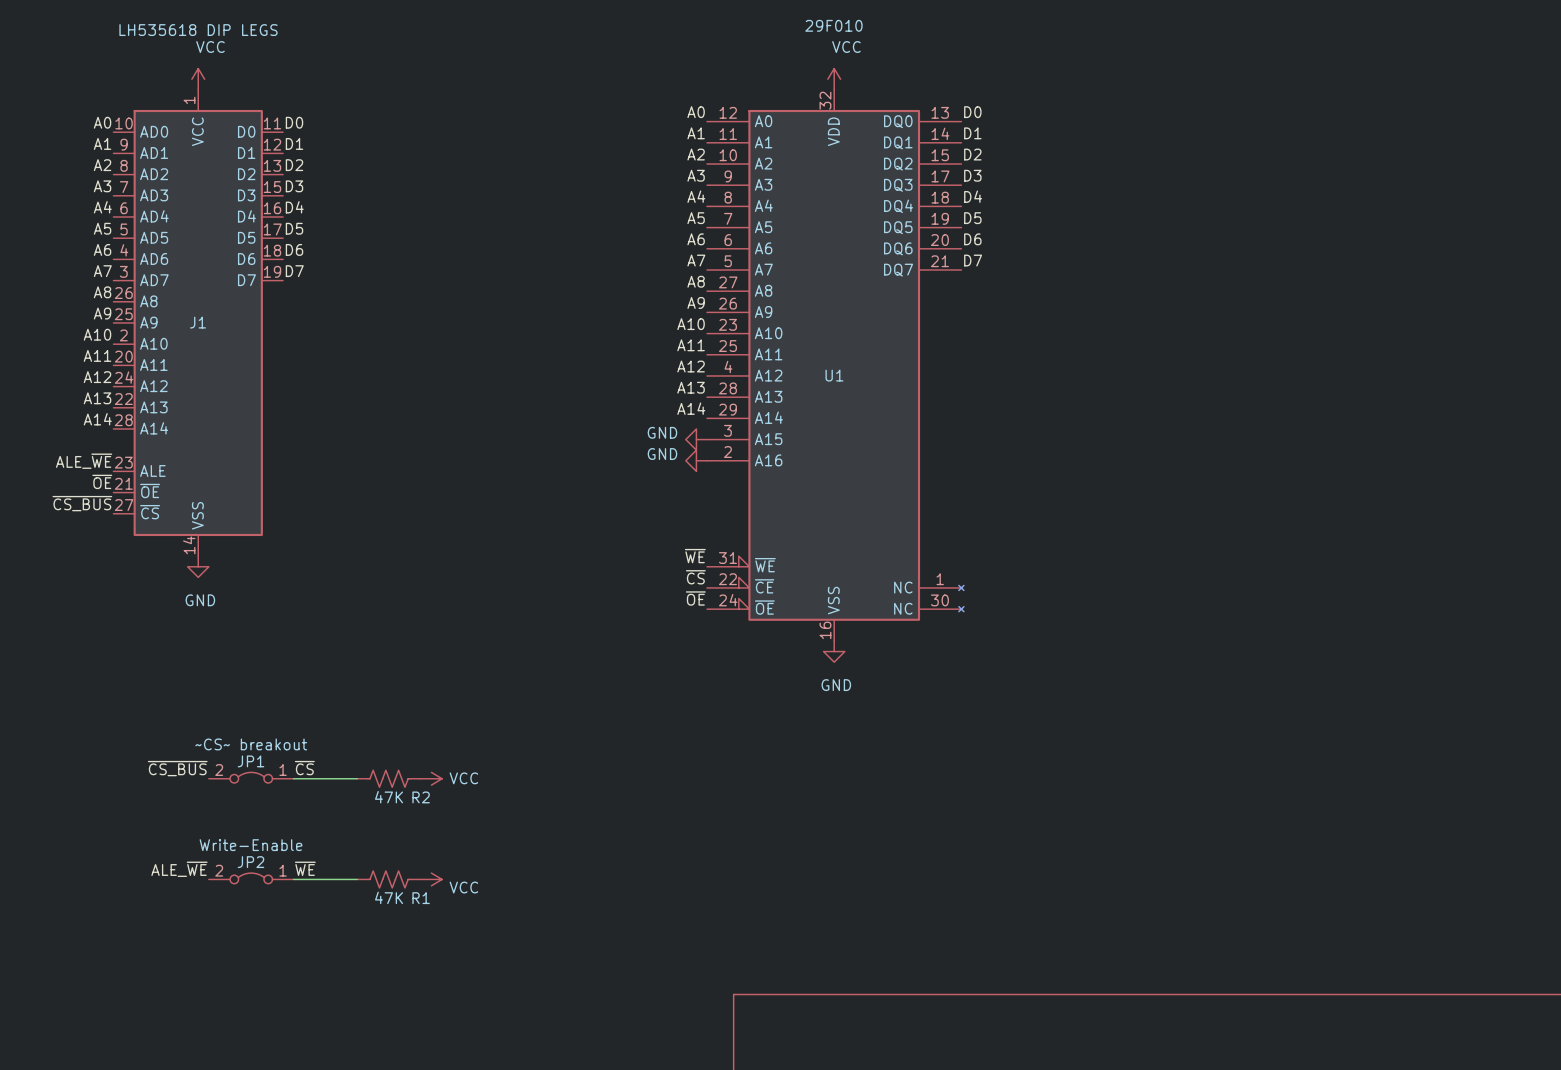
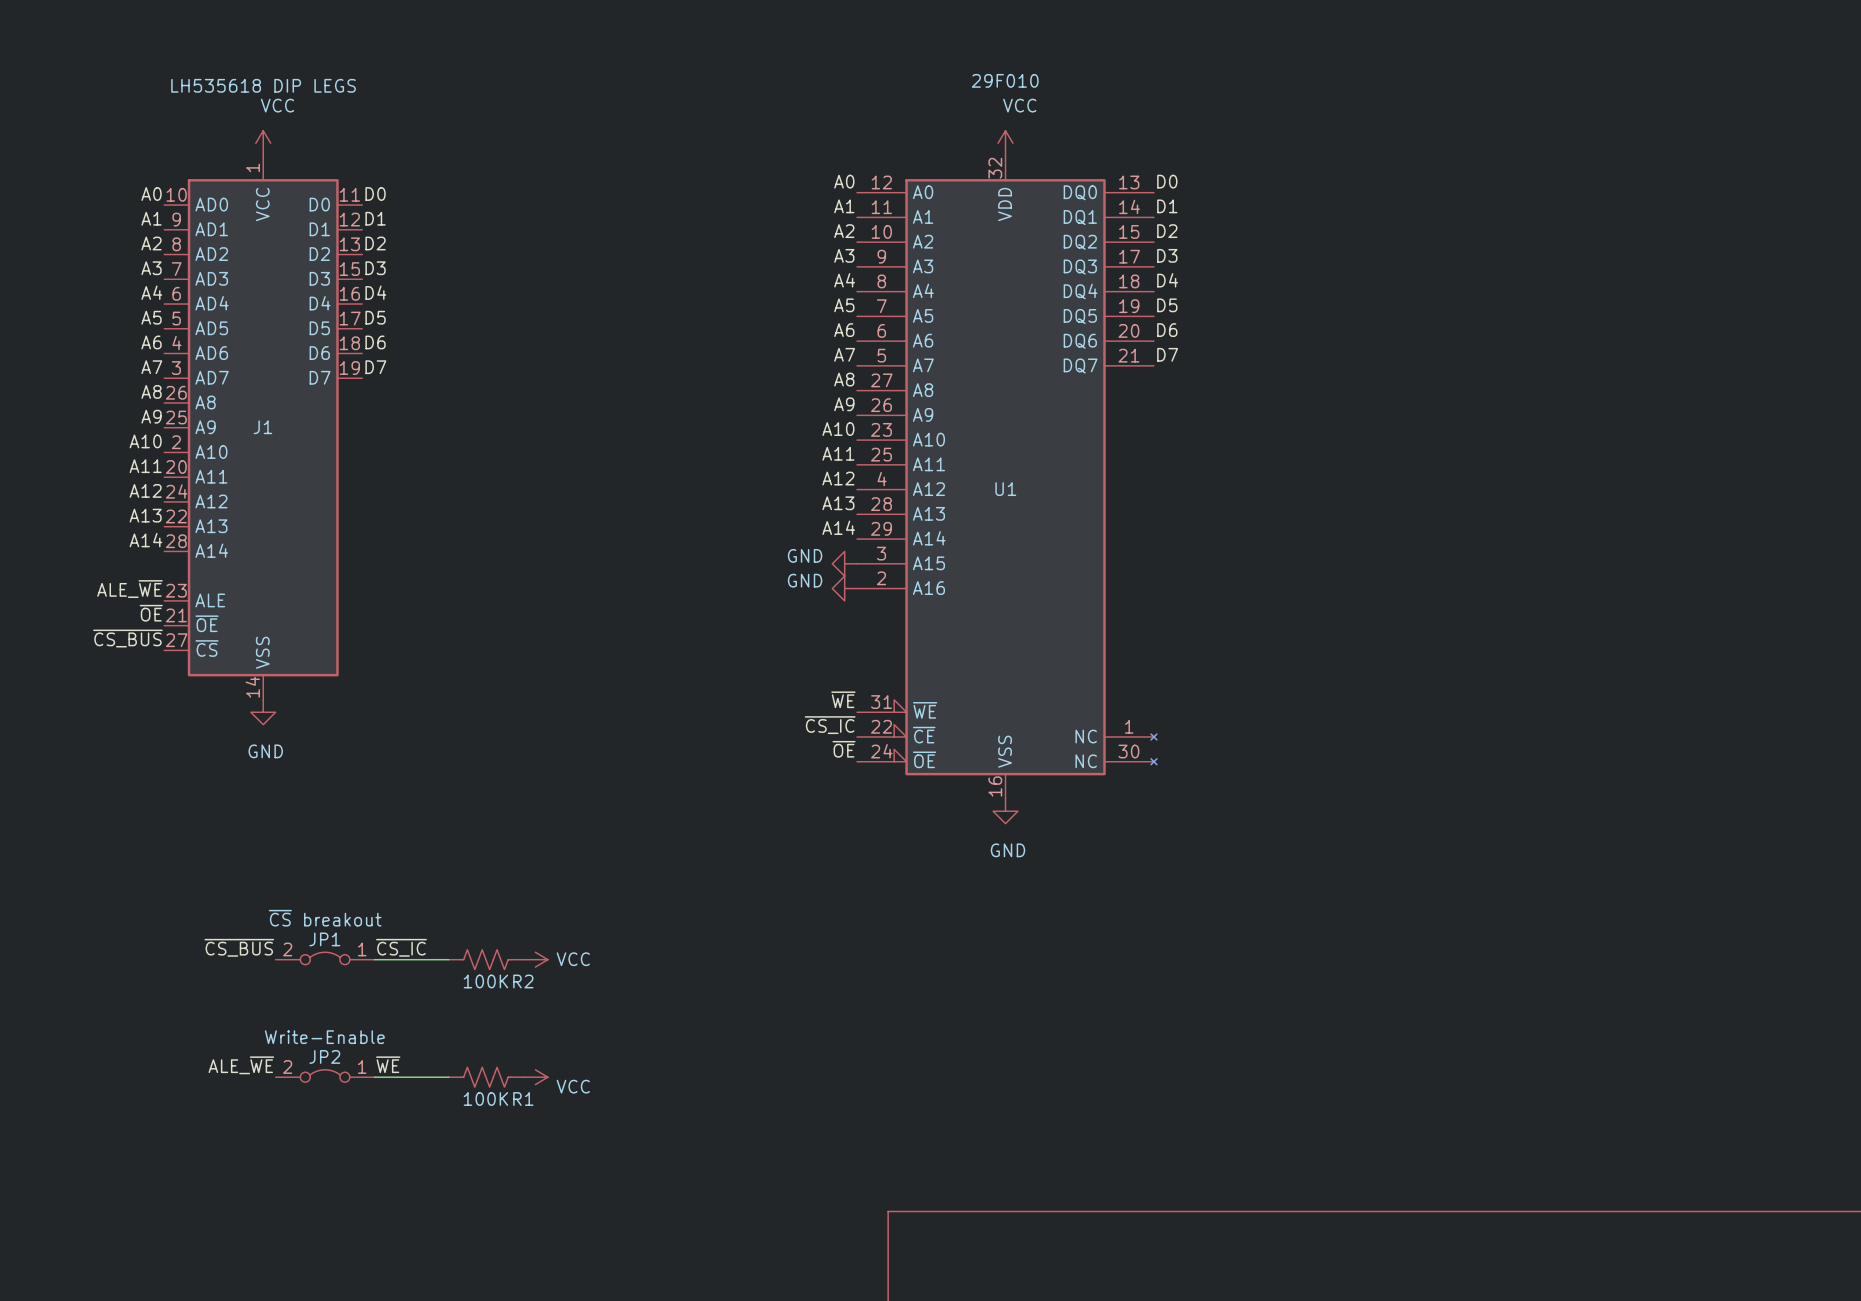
label: ~{CS} (695, 577) -> ~{CS_IC} (830, 725)
JP1 value: ~CS~ breakout (251, 744) -> ~{CS} breakout (325, 918)
label: ~{CS} (304, 768) -> ~{CS_IC} (401, 947)
R2 value: 47K (389, 797) -> 100K (485, 981)
R1 value: 47K (389, 897) -> 100K (485, 1099)

